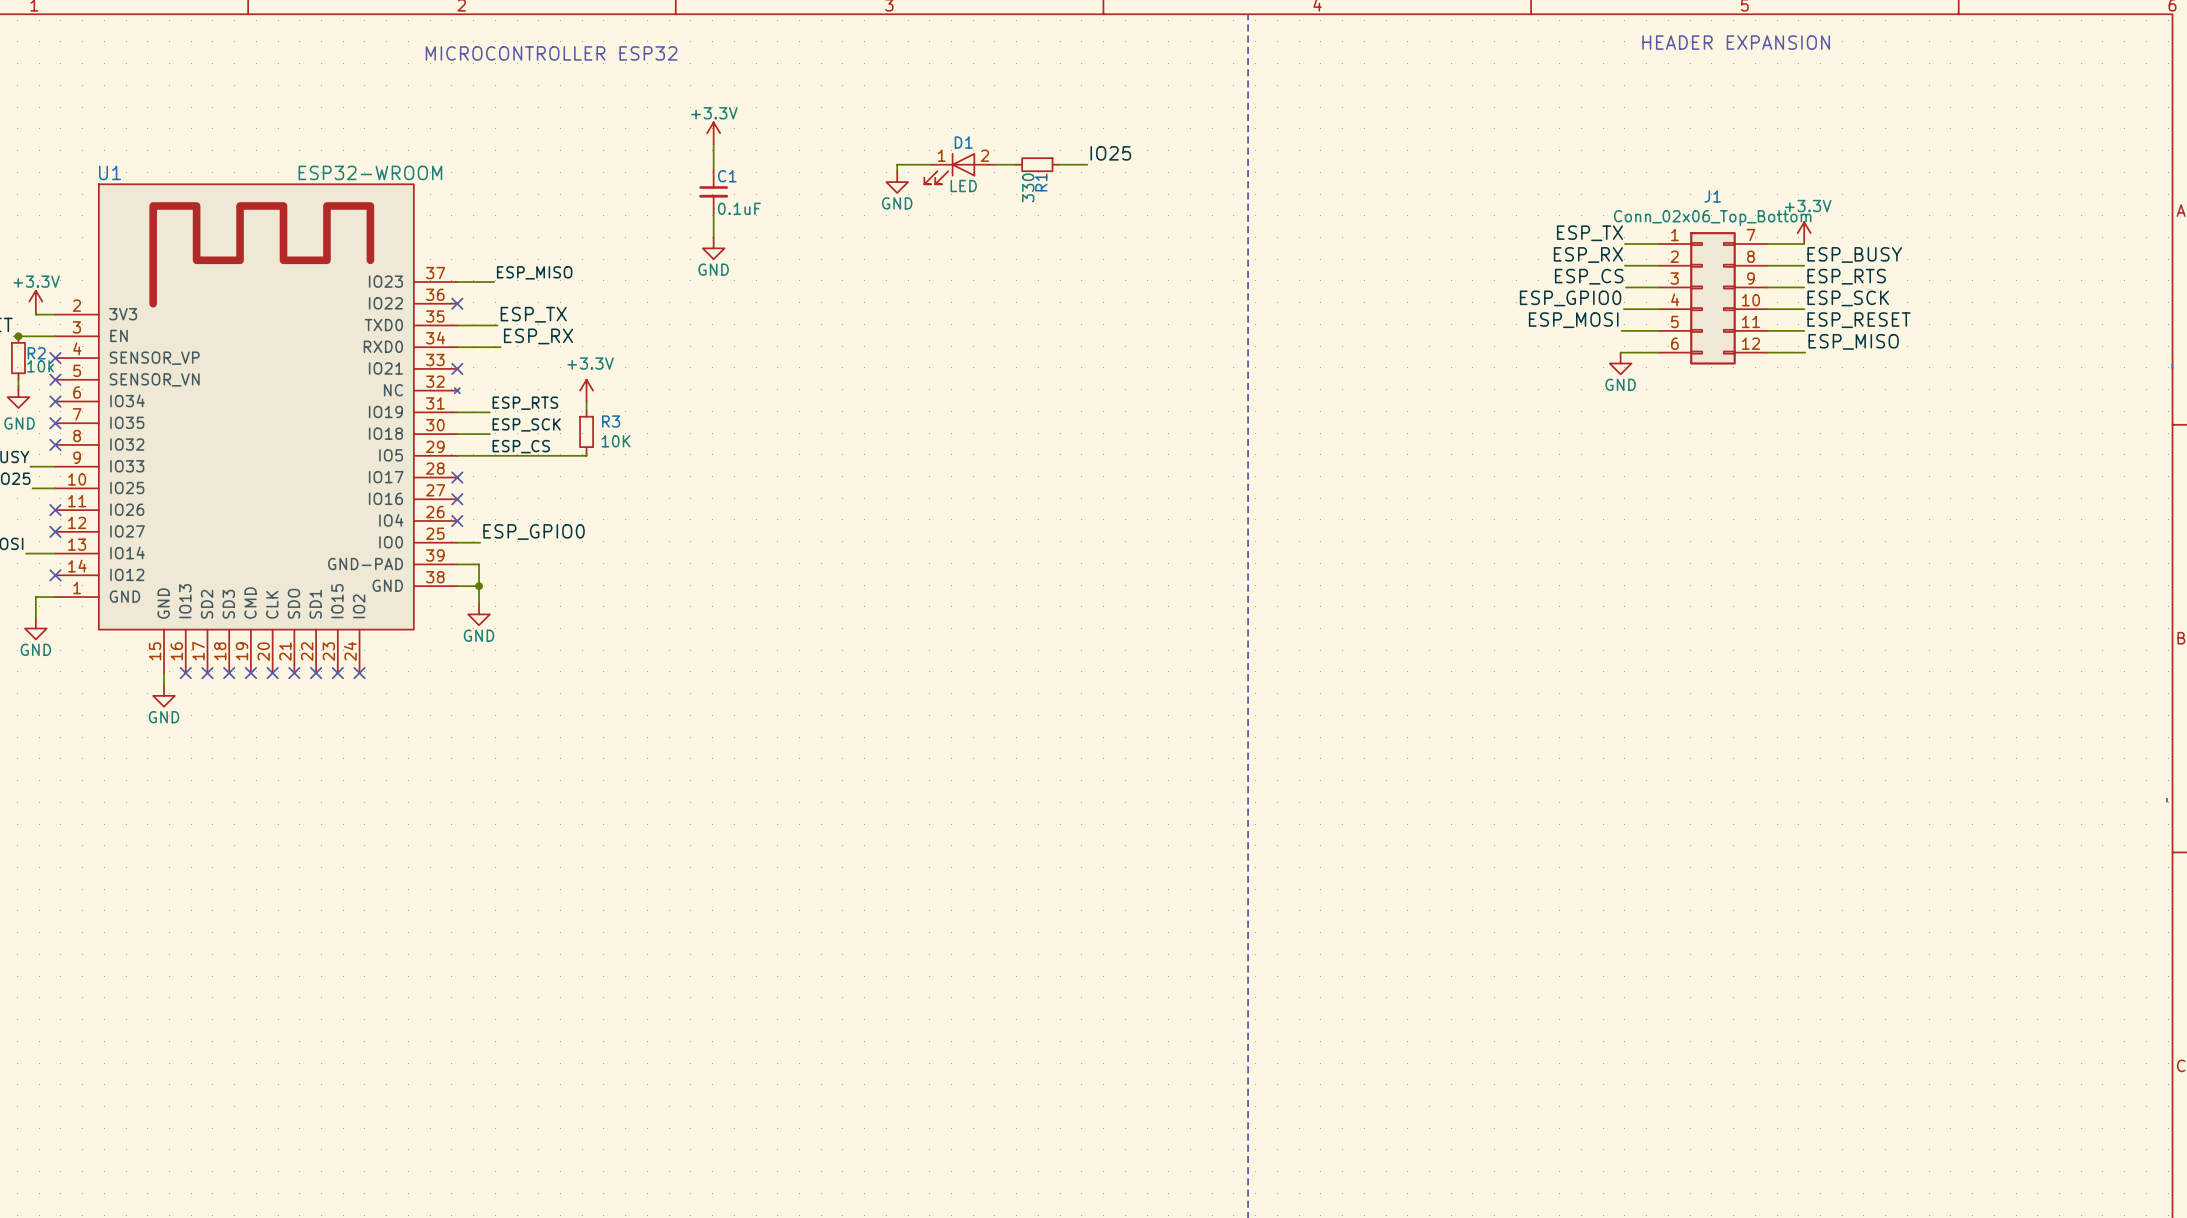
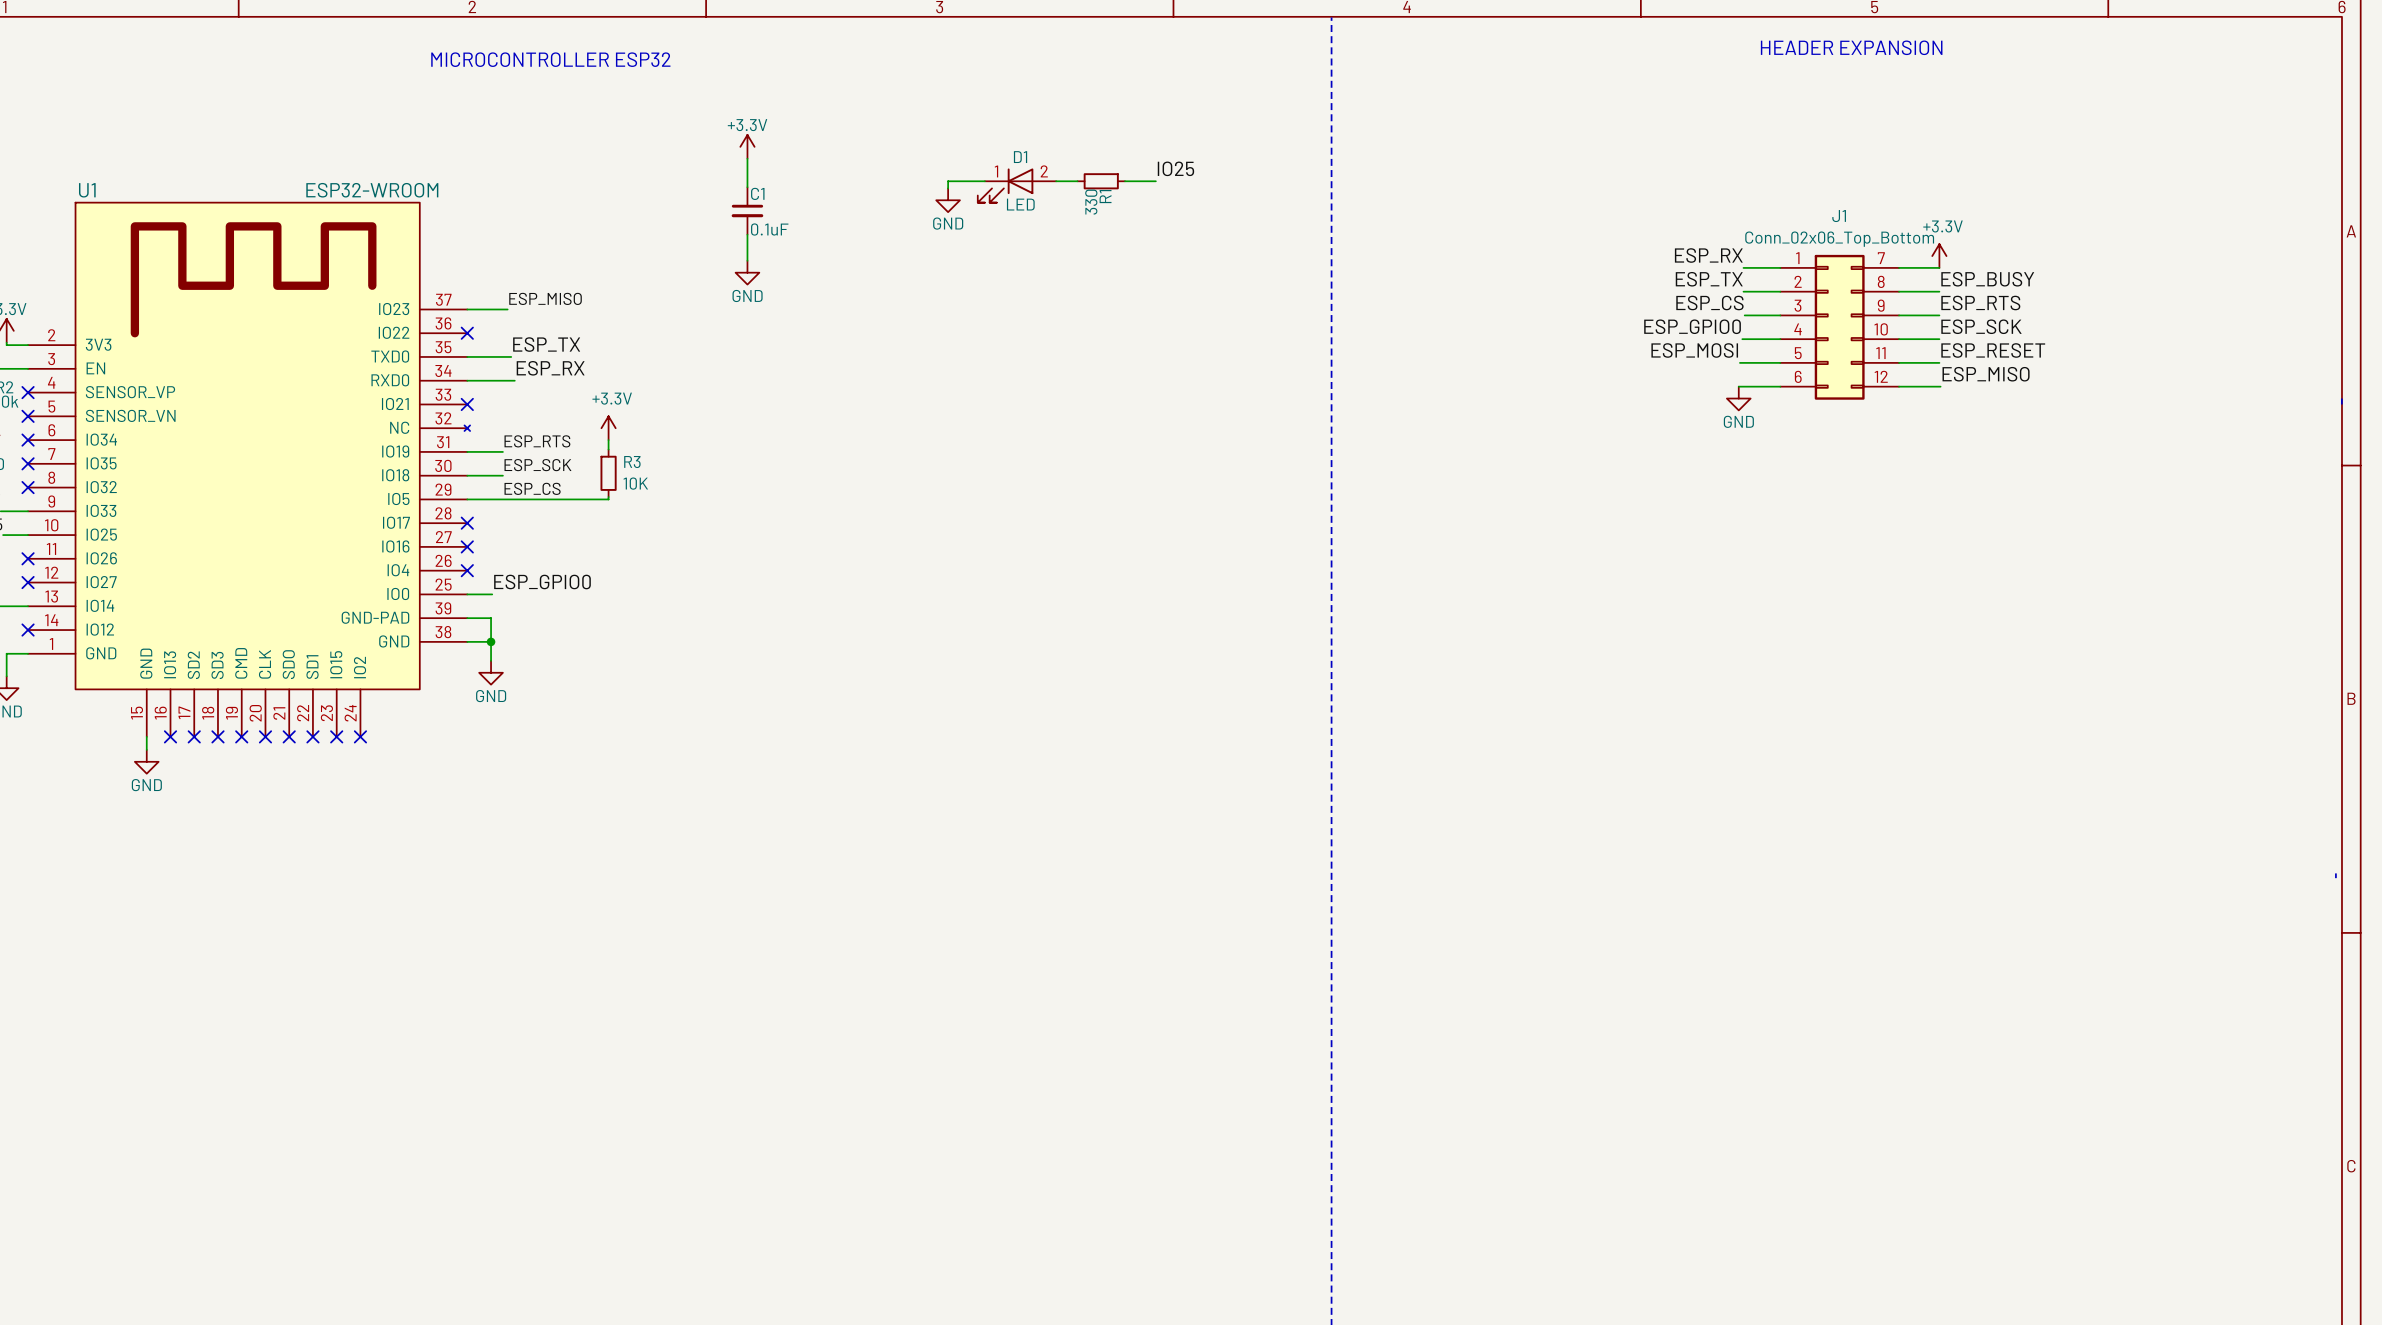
label: ESP_TX (1589, 233) -> ESP_RX (1708, 255)
label: ESP_RX (1588, 254) -> ESP_TX (1709, 279)

